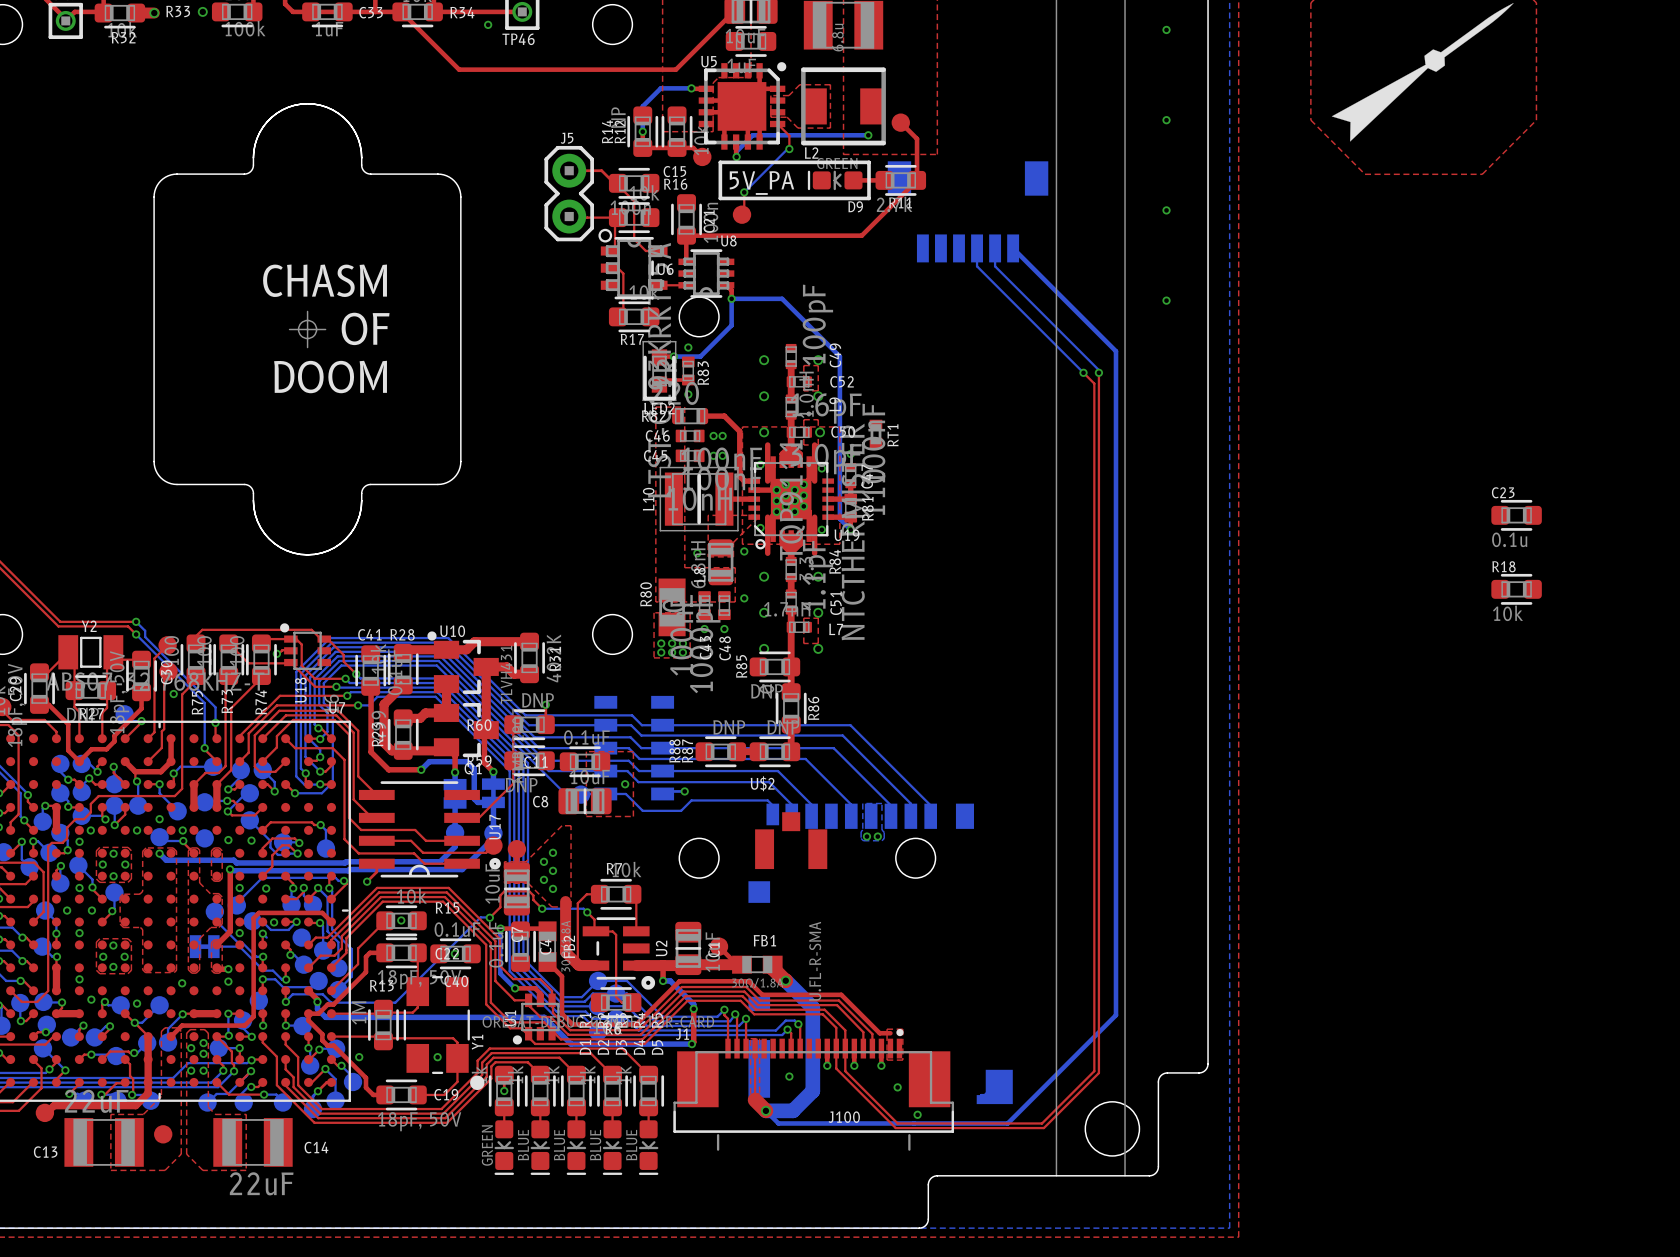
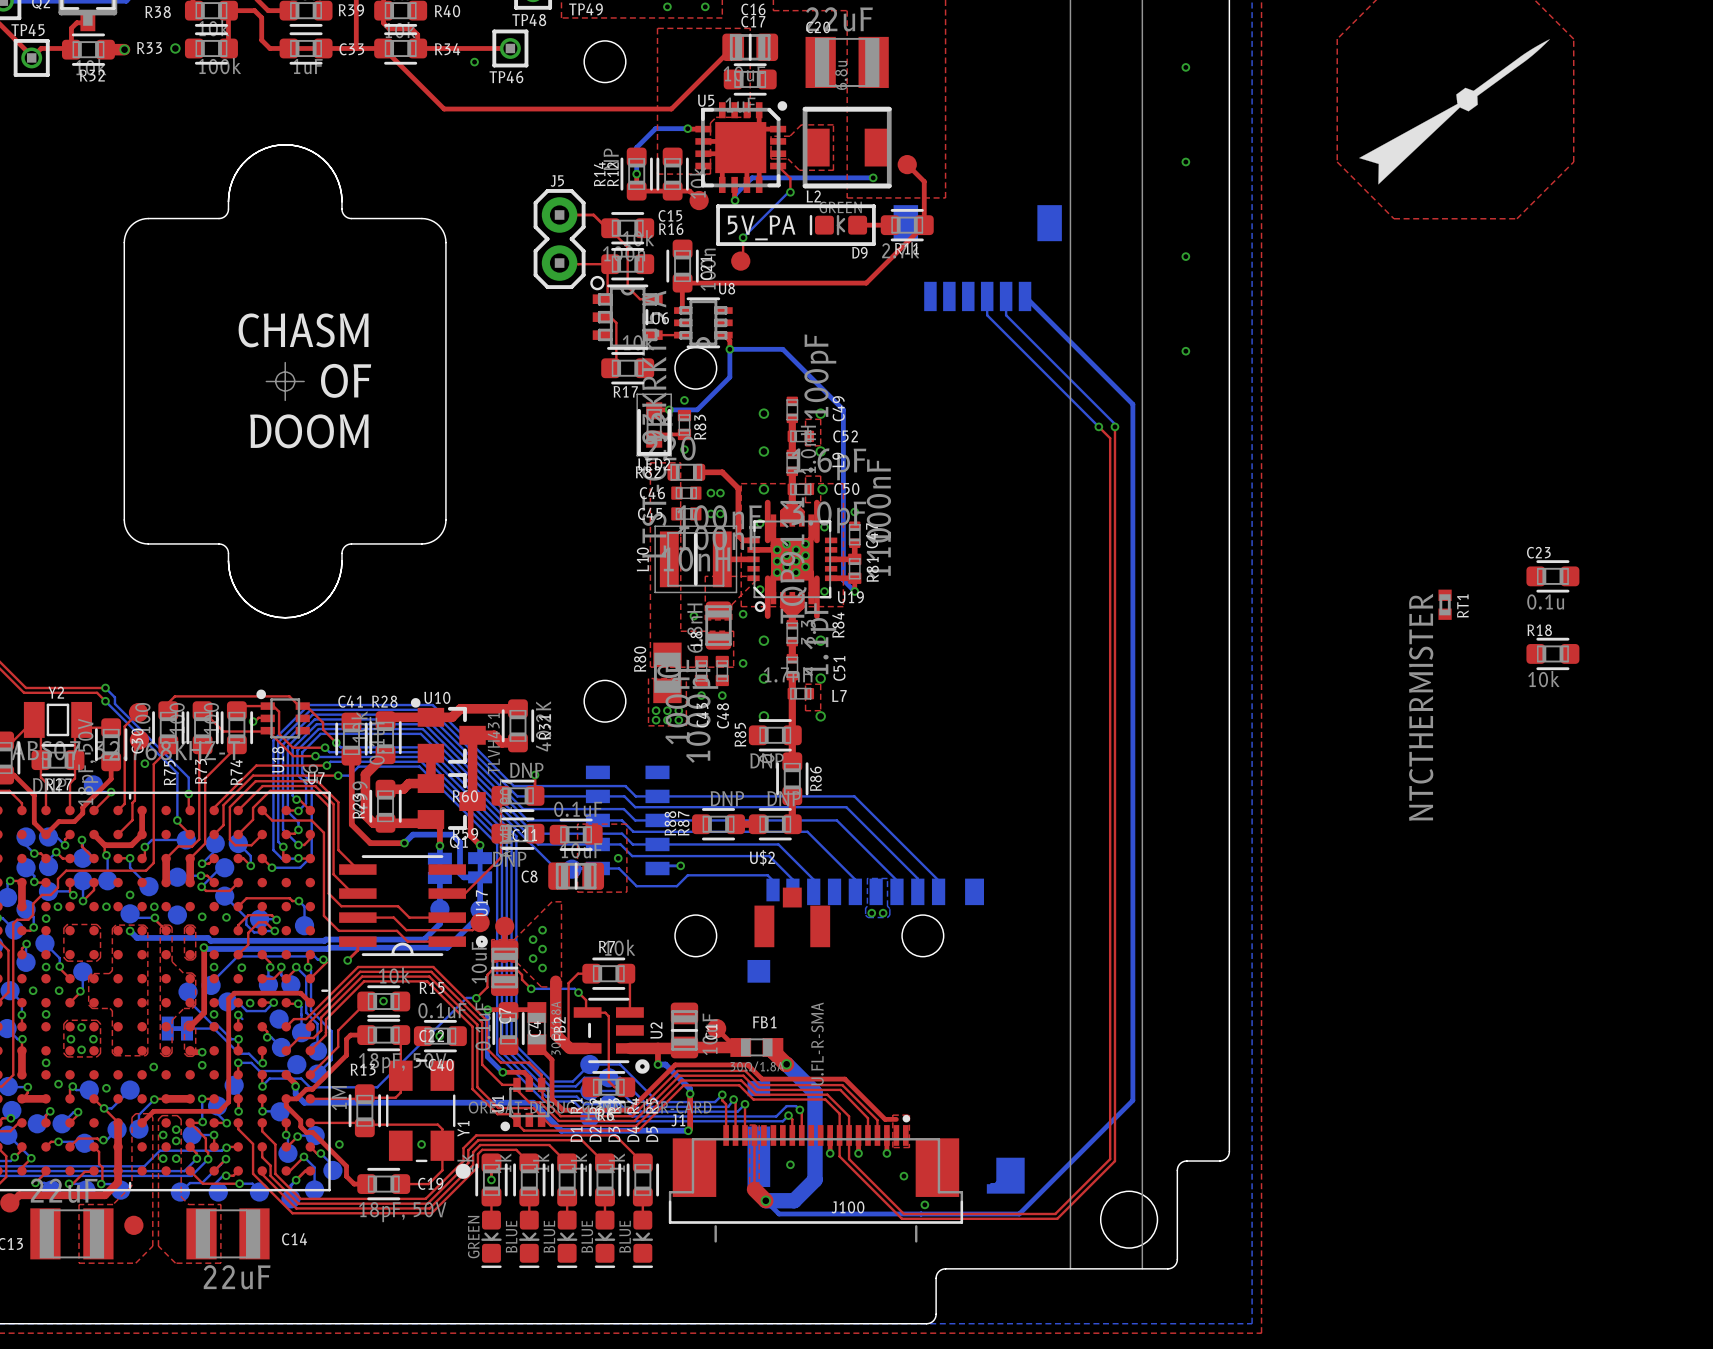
RT1 position: (875, 434) -> (1445, 604)
via: (113, 853) -> none
via: (102, 864) -> none
via: (125, 864) -> none
via: (113, 876) -> none

